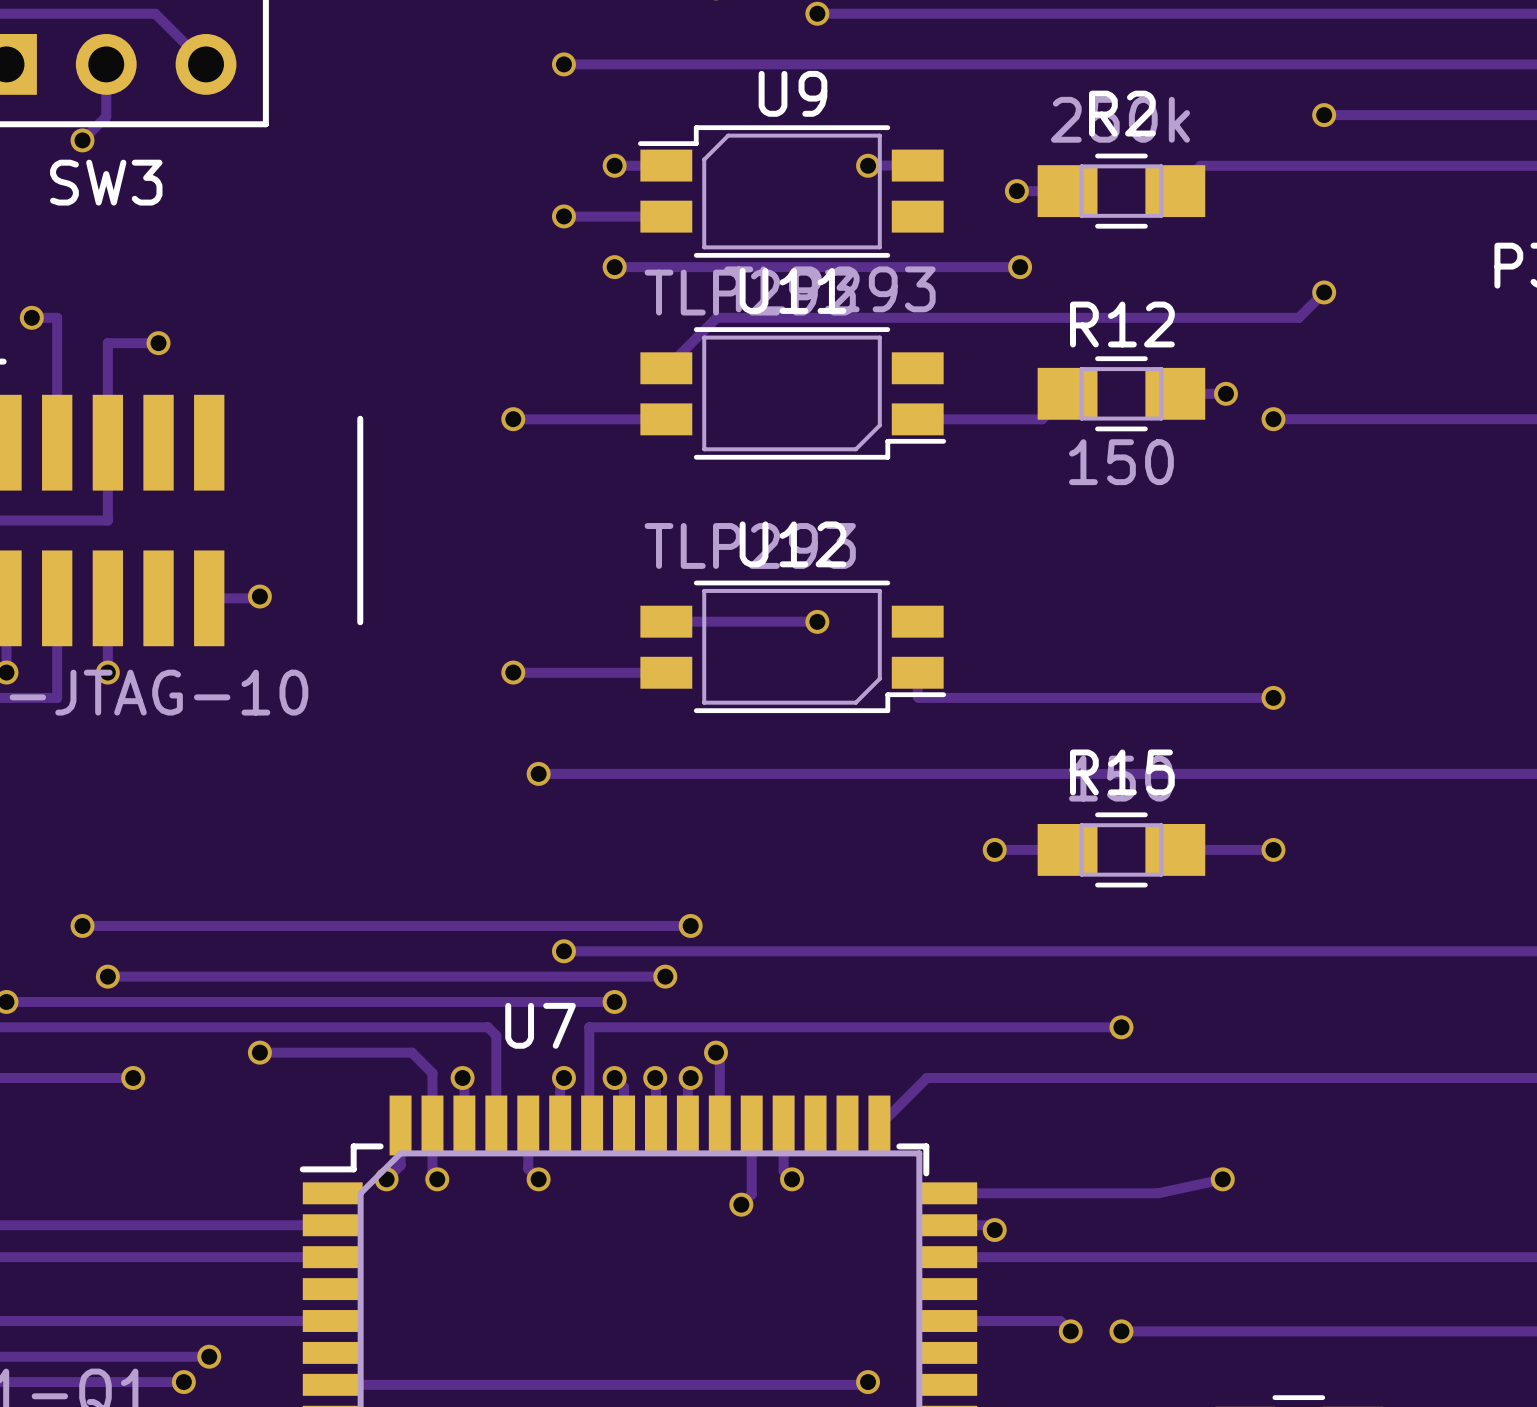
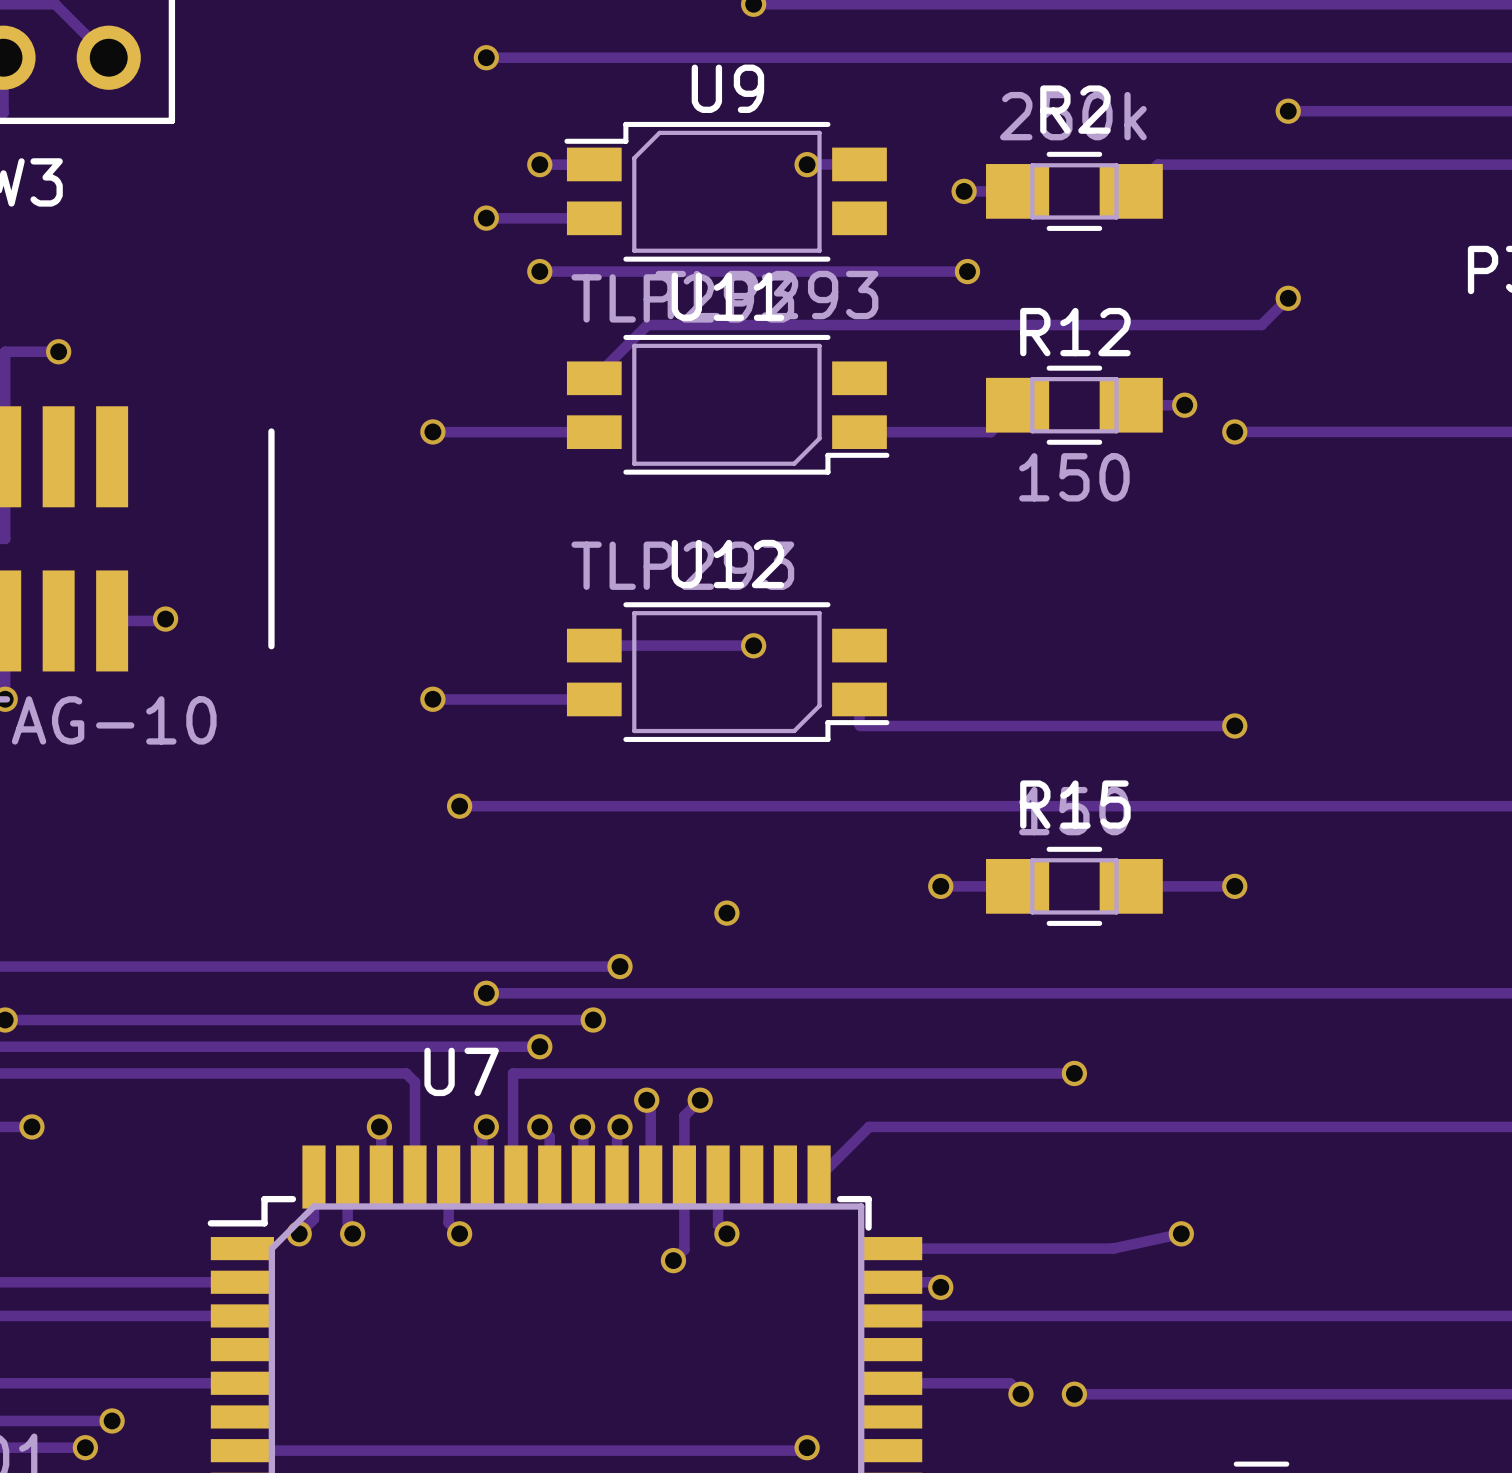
via: none -> (726, 913)
track: (259, 1052) (411, 1052) (432, 1073) (432, 1125) -> none
via: (259, 1052) -> none
track: none -> (700, 1100) (684, 1115) (684, 1177)
via: none -> (700, 1100)

